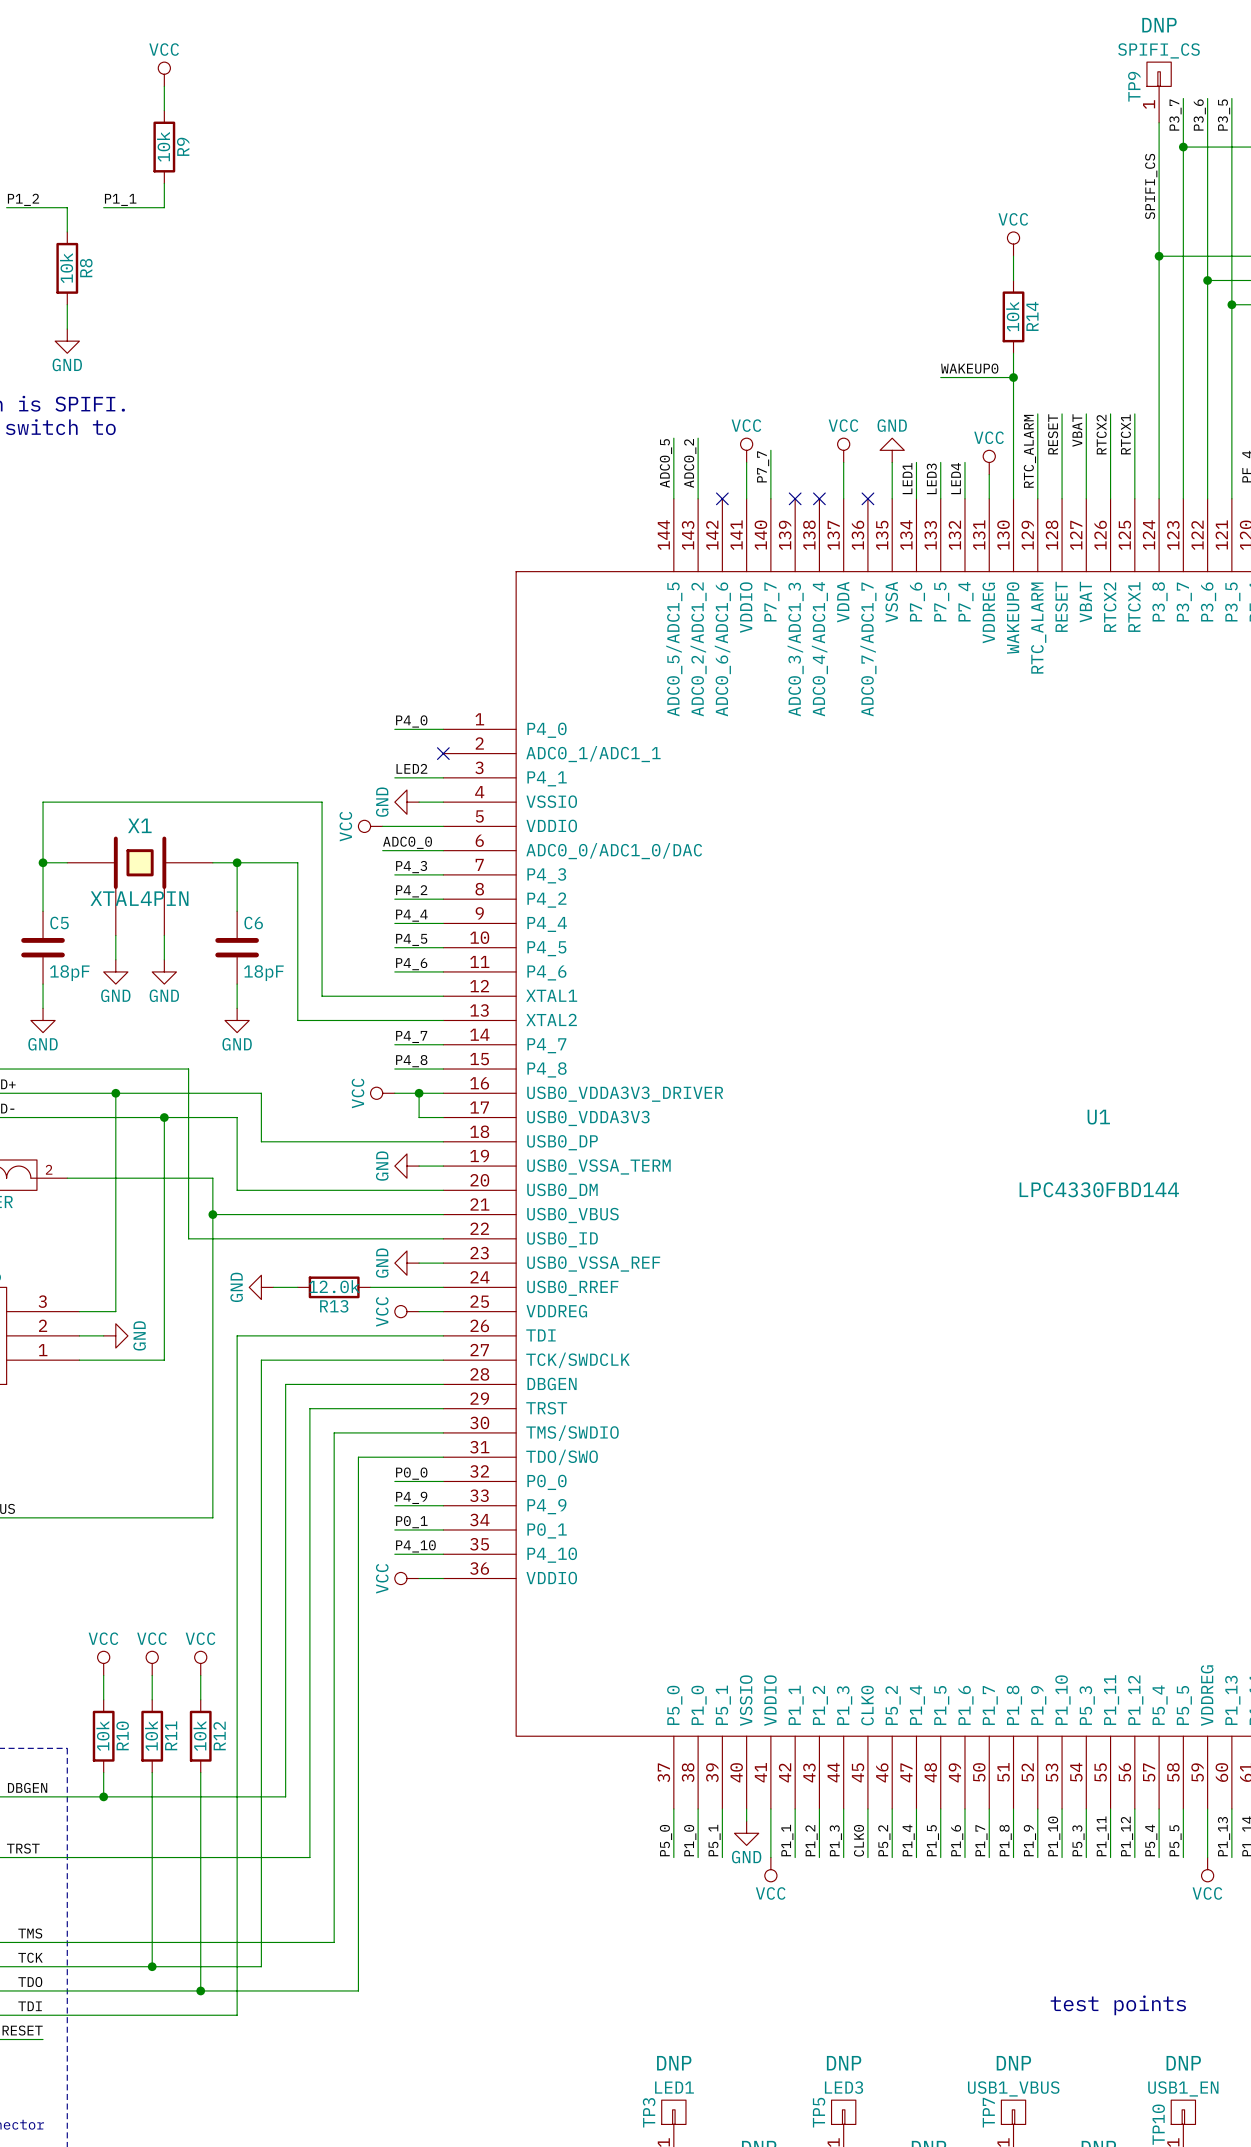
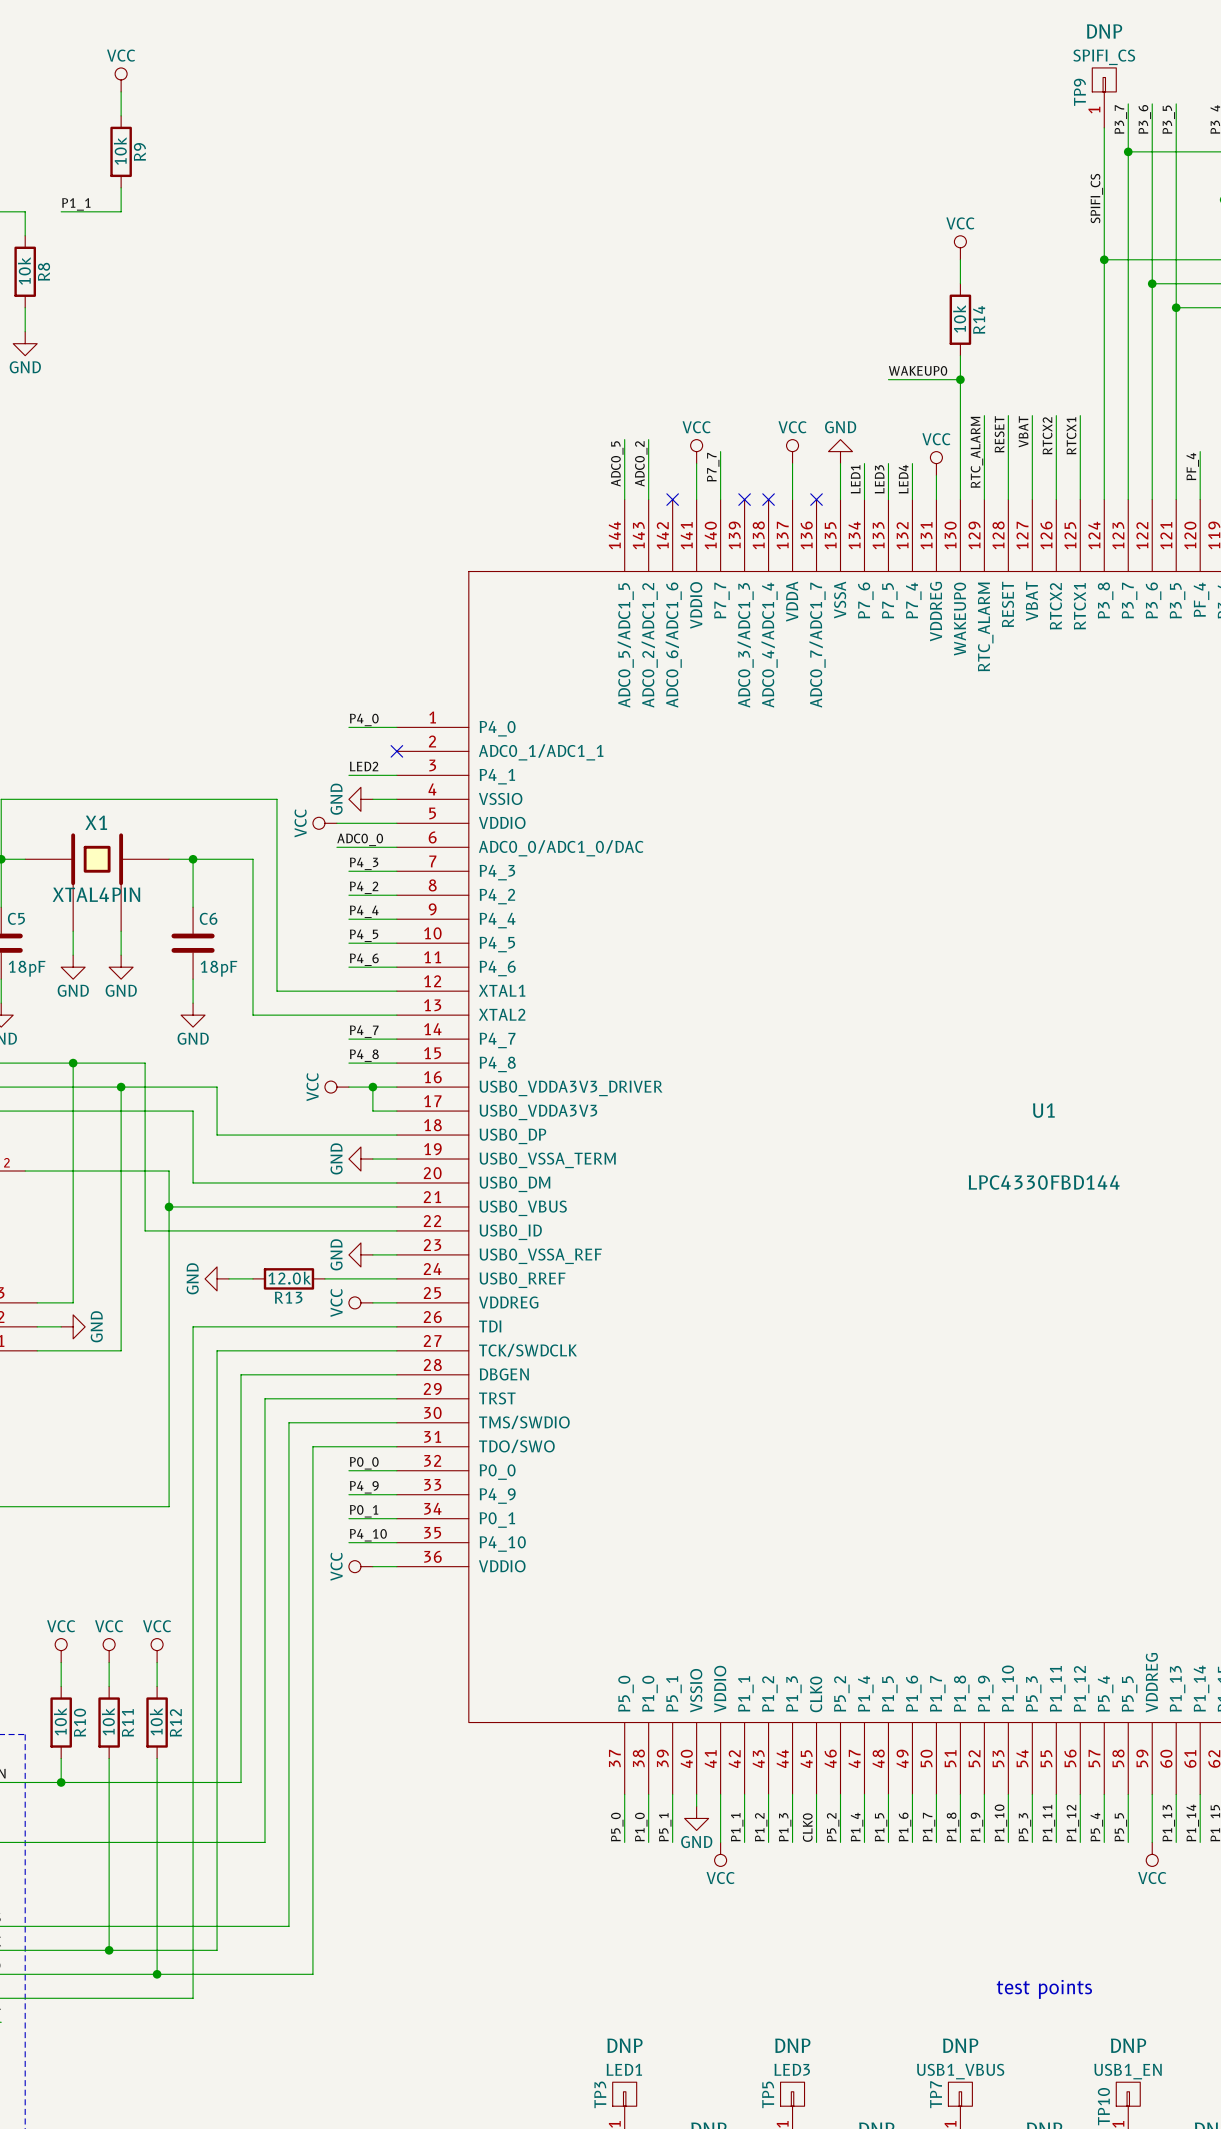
wire: none -> (73, 1063) (73, 1087)
junction: none -> (73, 1063)
junction: (115, 1093) -> none
wire: none -> (121, 1087) (121, 1111)
junction: none -> (121, 1087)
junction: (164, 1117) -> none

